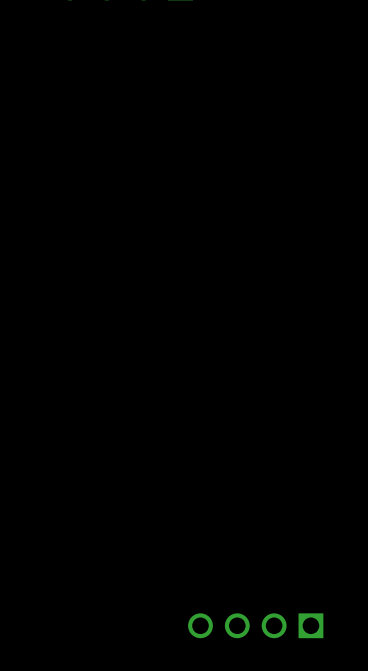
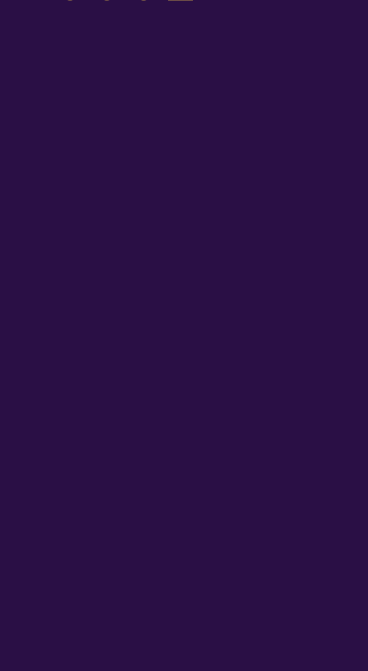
part: (255, 625) -> none

